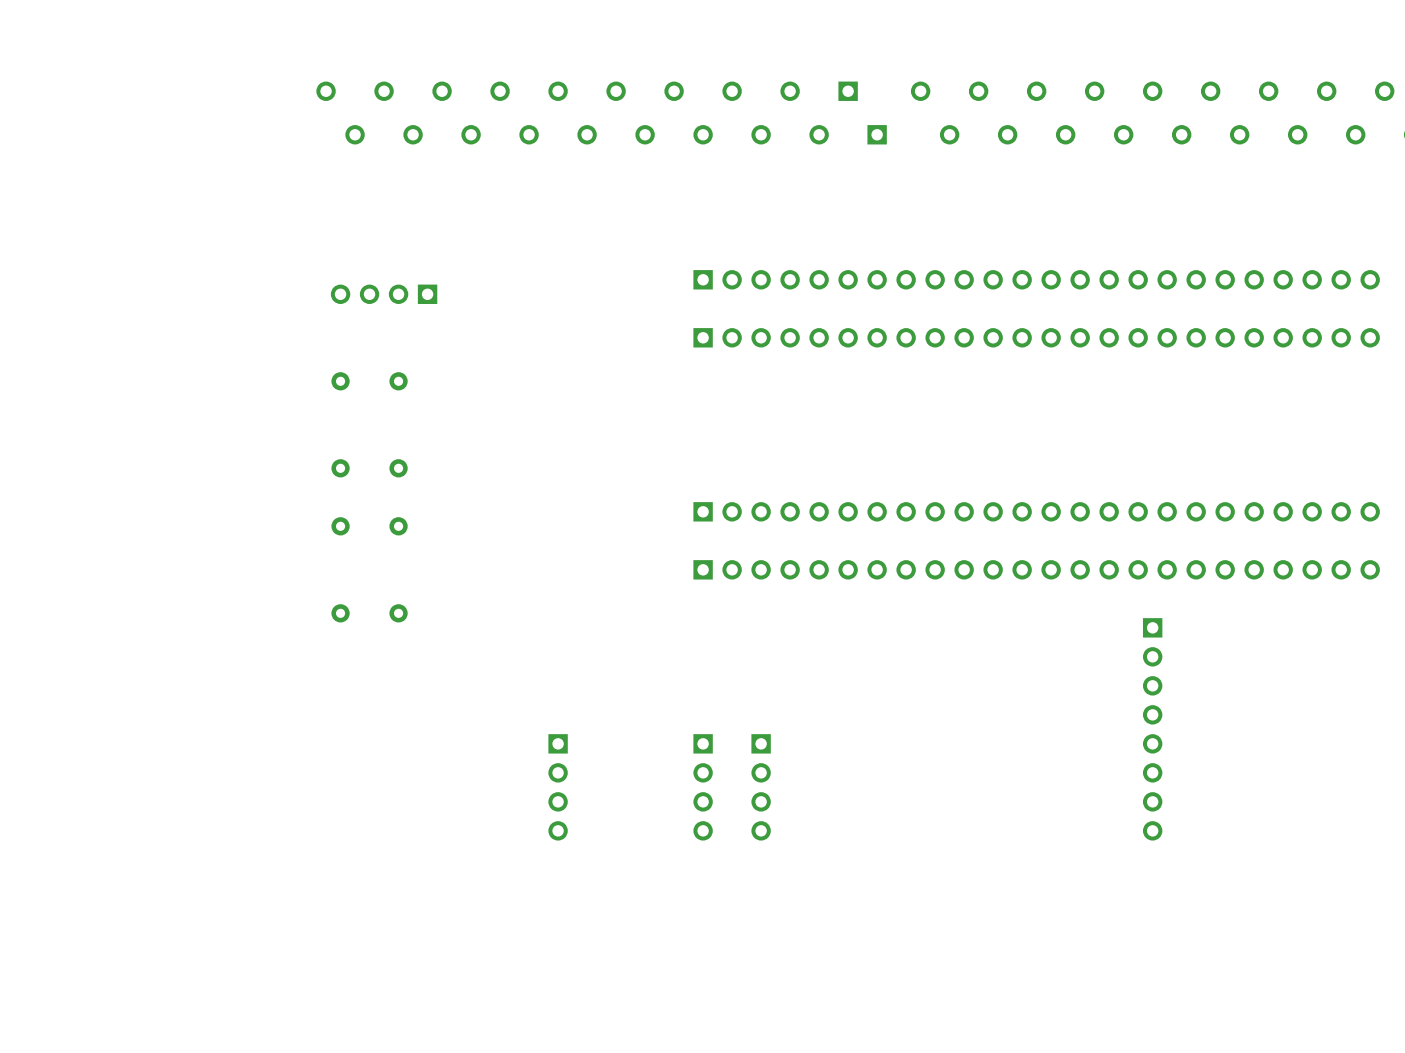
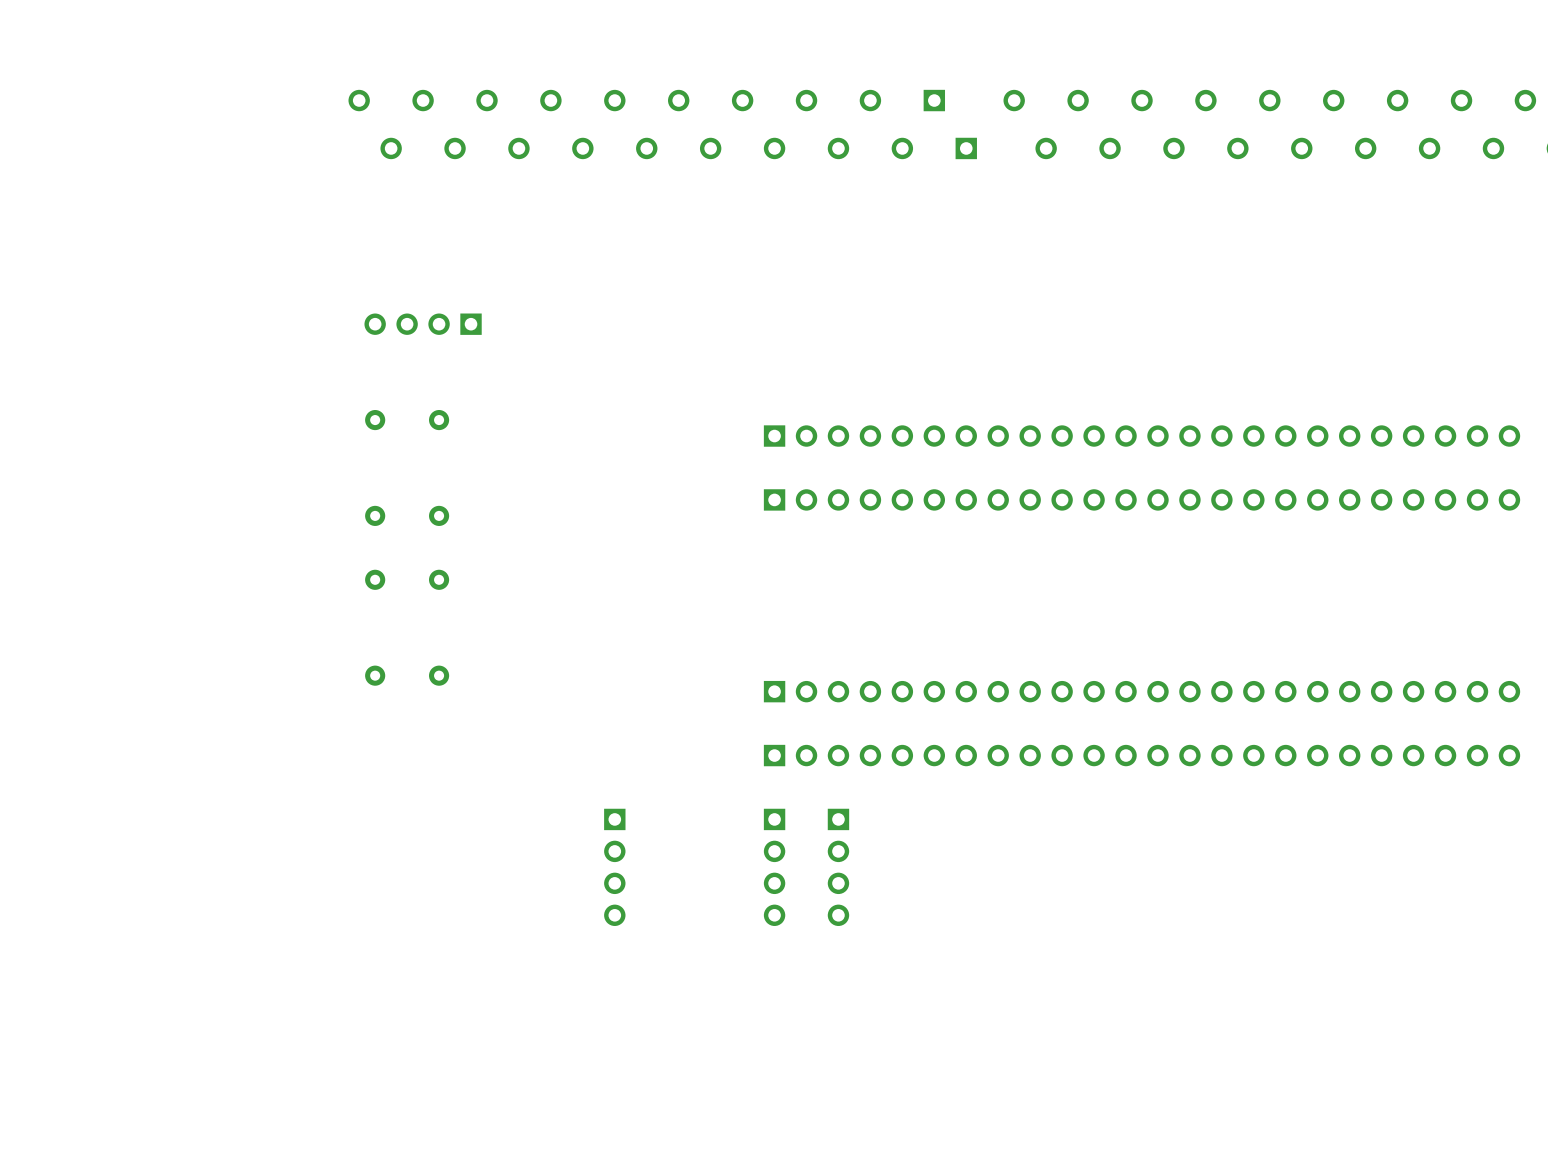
part: (1036, 279) -> none
part: (1036, 337) -> none
part: none -> (1142, 436)
part: none -> (1142, 499)
part: (1036, 511) -> none
part: (1036, 569) -> none
part: none -> (1142, 691)
part: none -> (1142, 755)
part: (1152, 729) -> none

